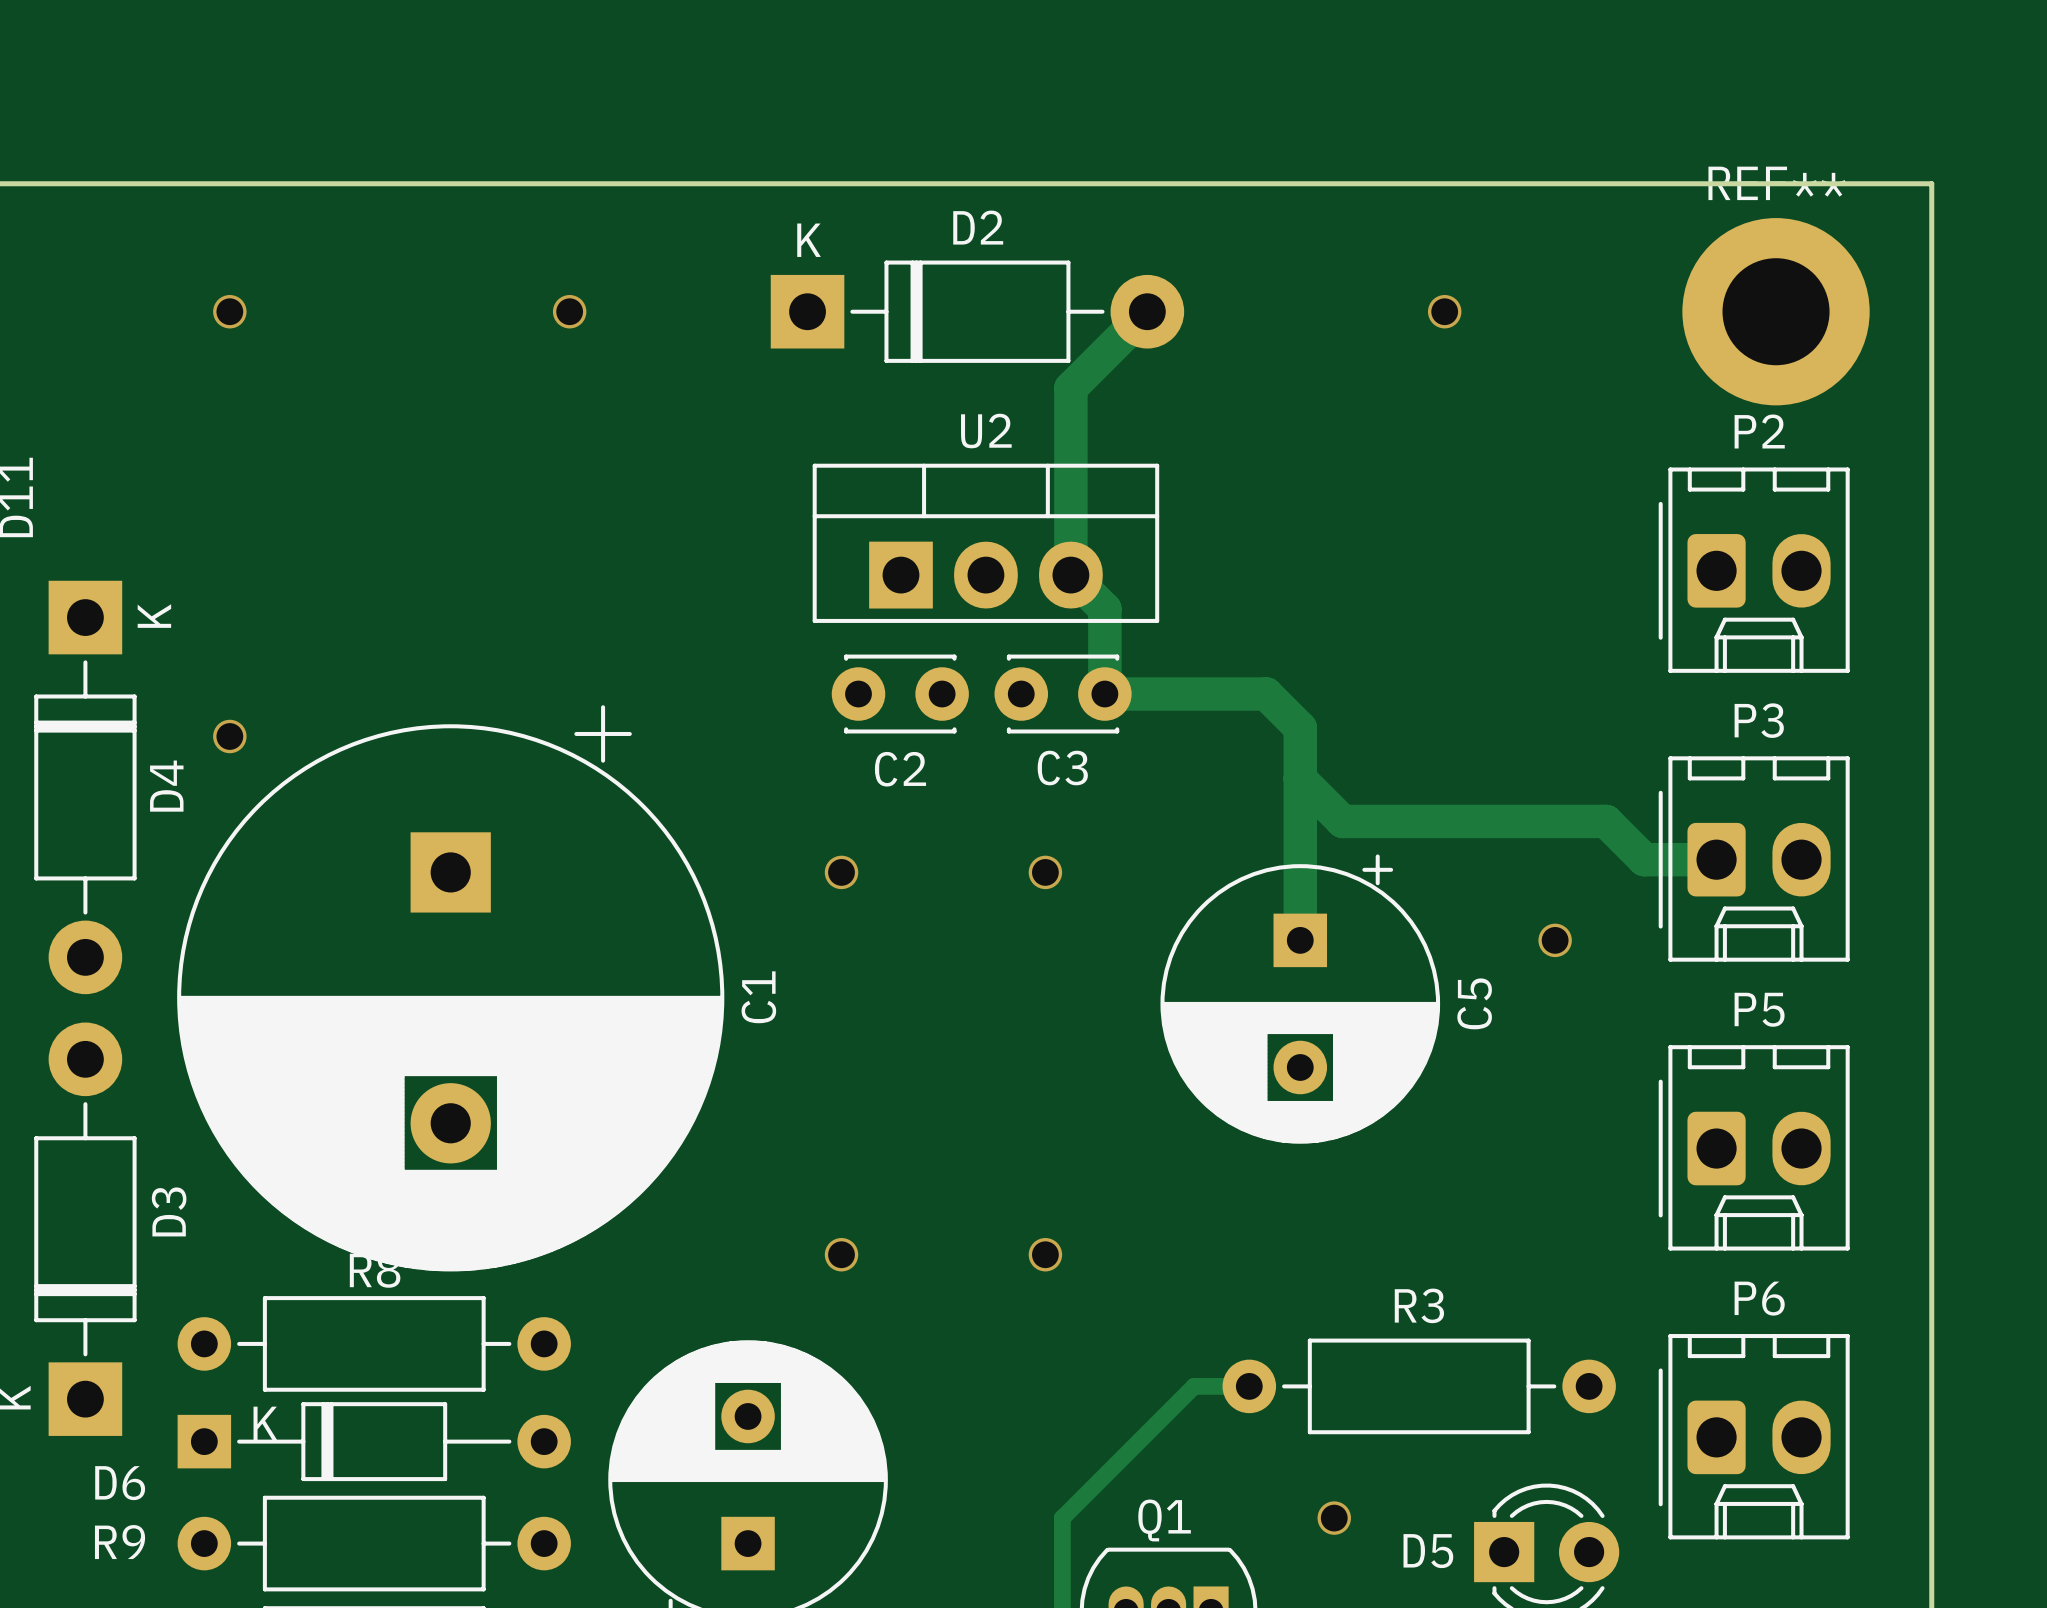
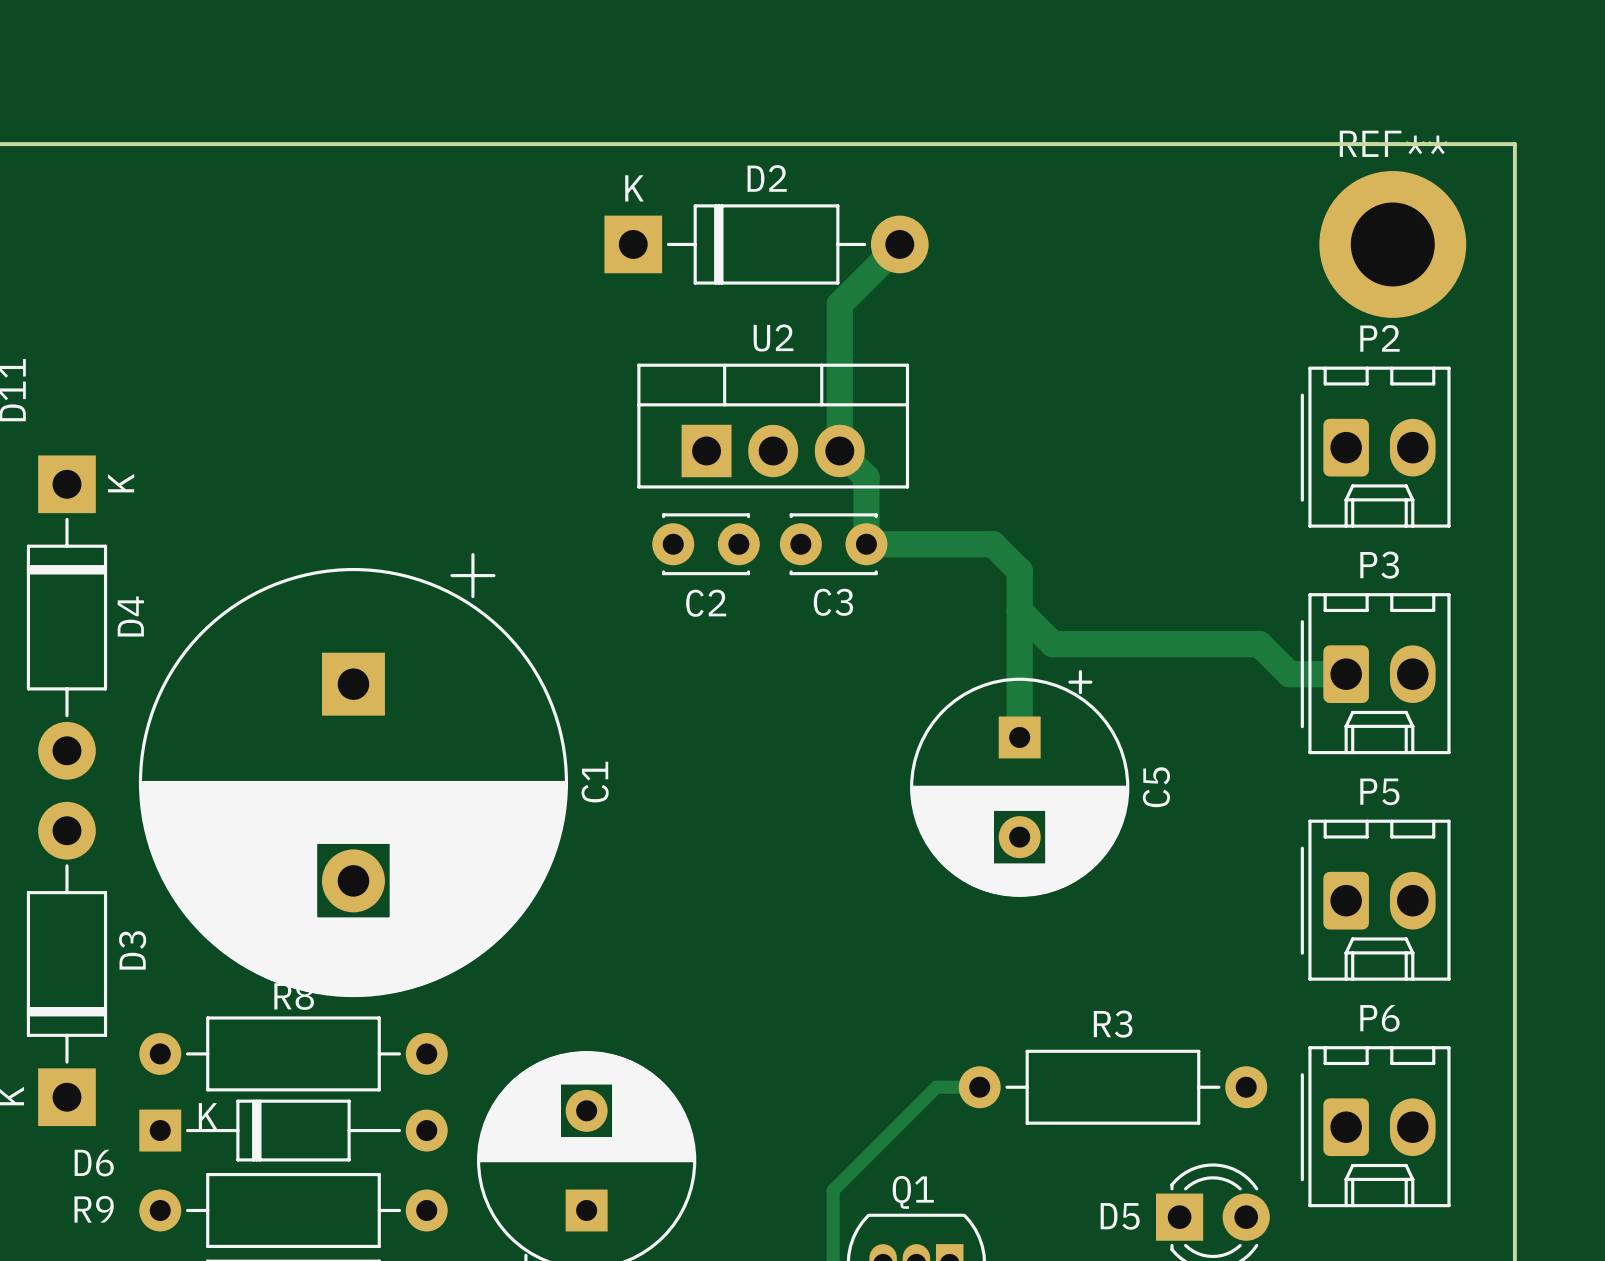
via: (229, 311) -> none
via: (569, 311) -> none
via: (1444, 311) -> none
via: (229, 736) -> none
via: (841, 872) -> none
via: (1045, 872) -> none
via: (1555, 940) -> none
via: (841, 1254) -> none
via: (1045, 1254) -> none
via: (1334, 1518) -> none

